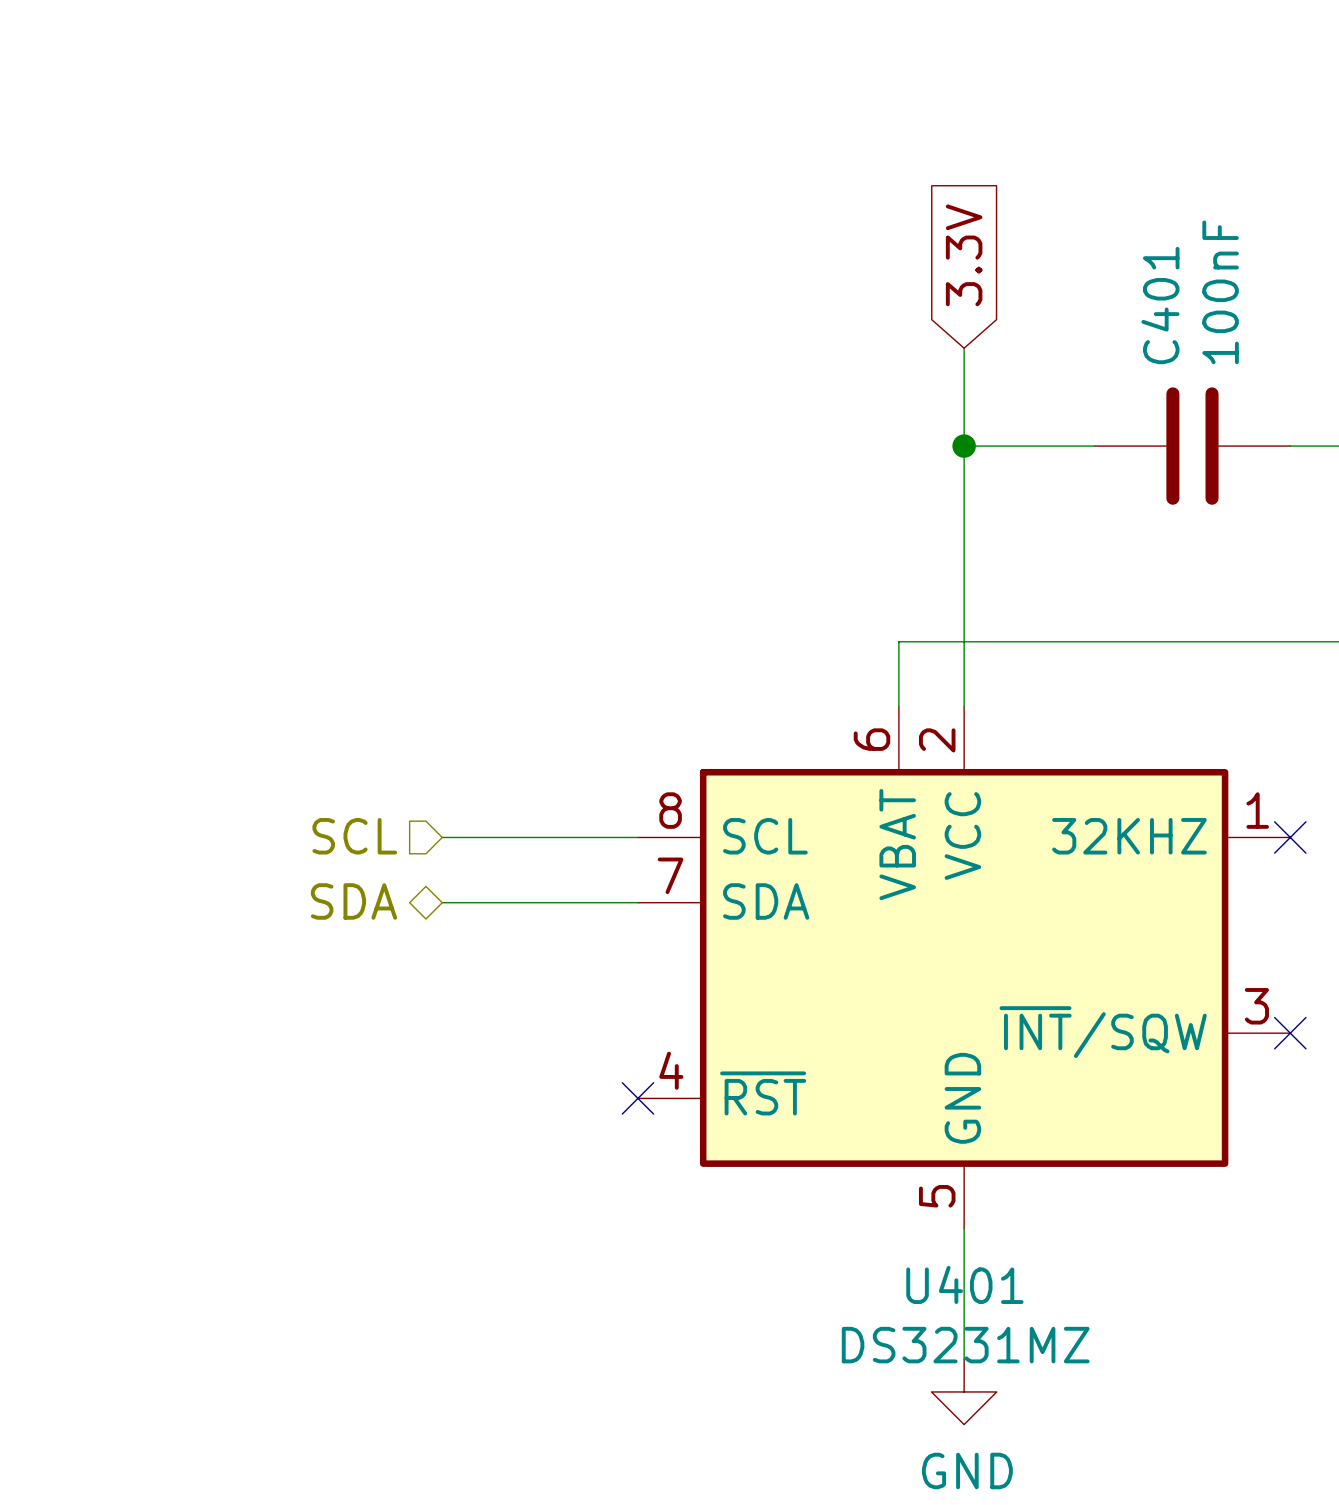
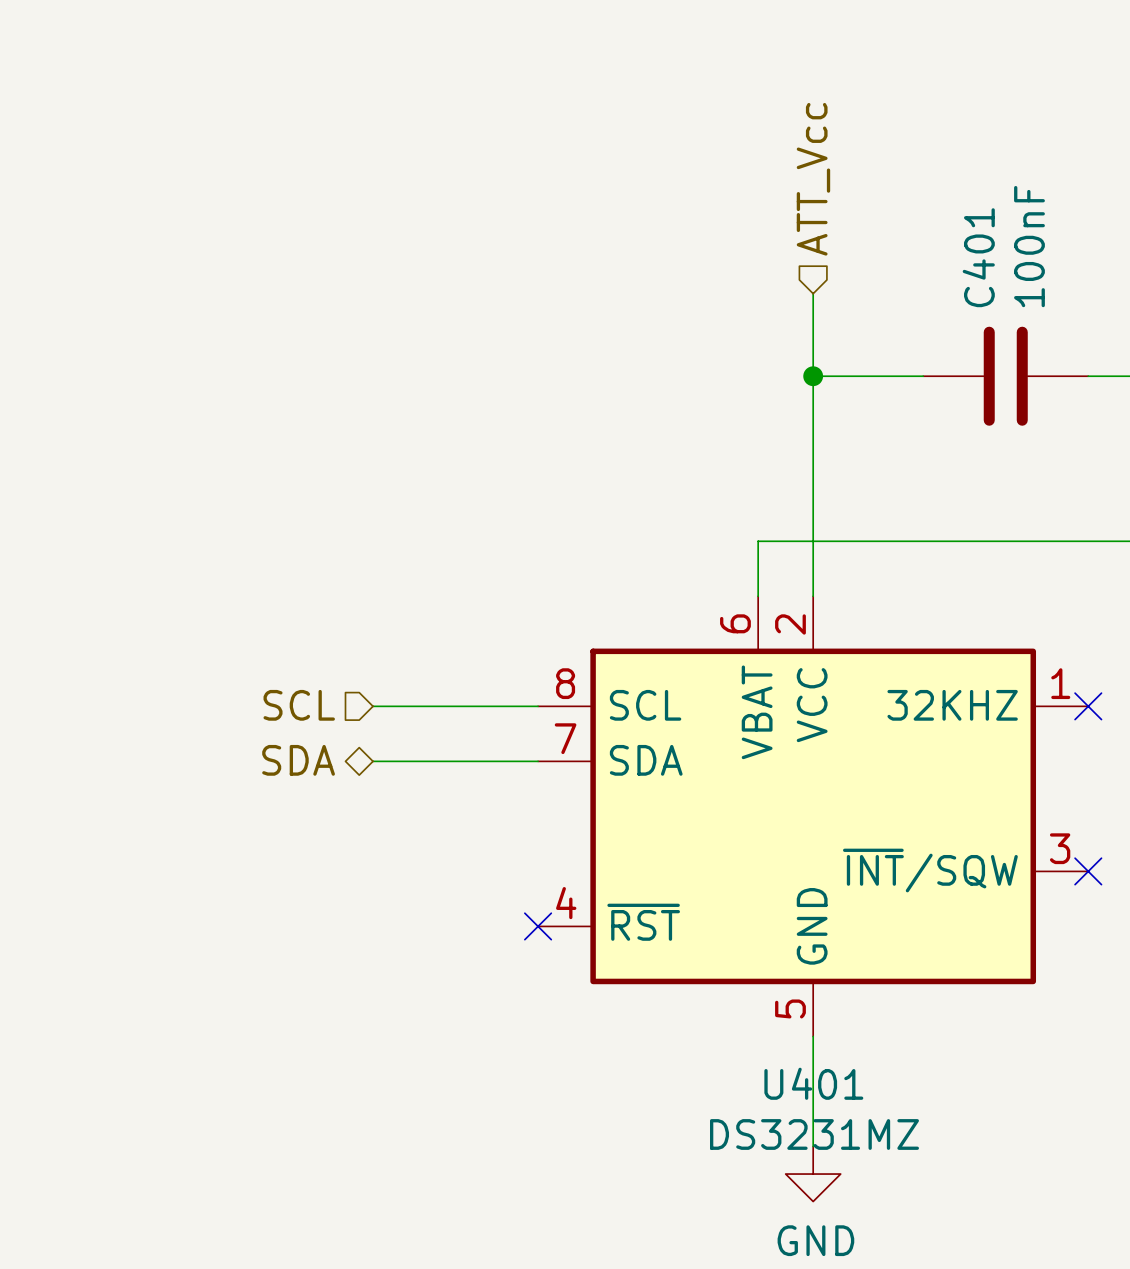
hierarchical label: none -> ATT_Vcc (813, 179)
global label: 3.3V (964, 255) -> none

